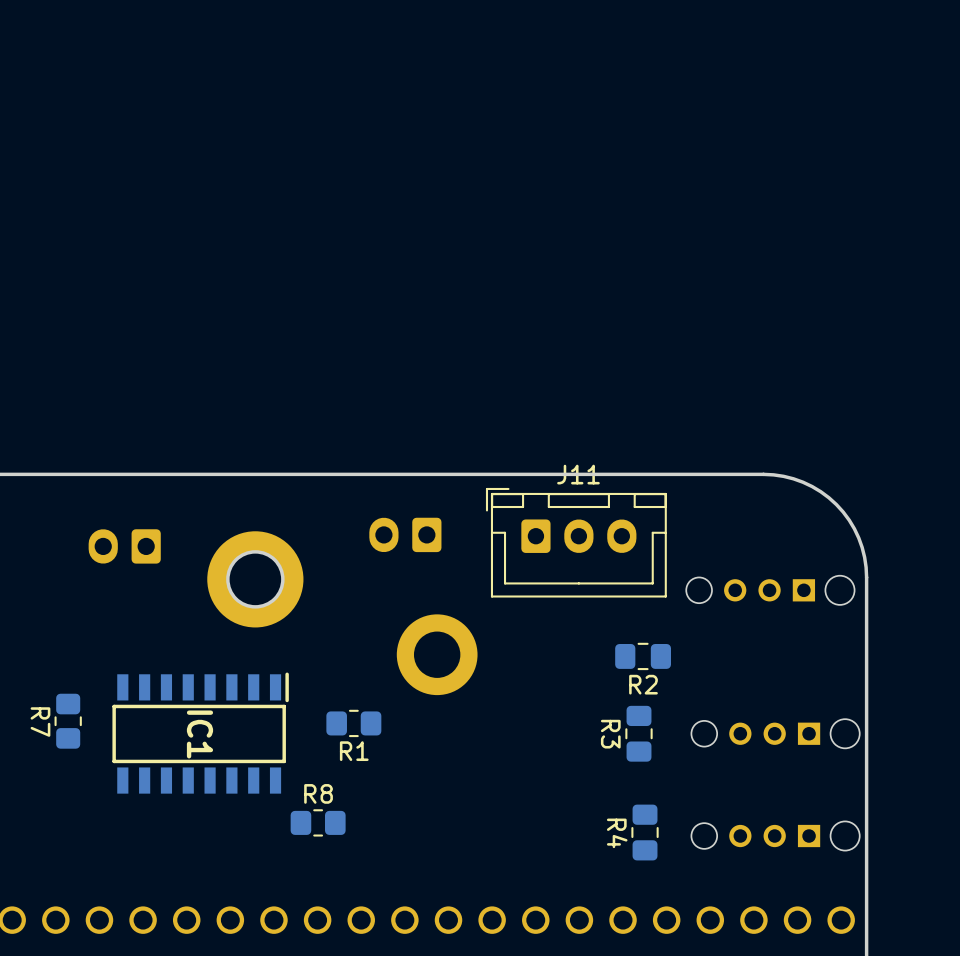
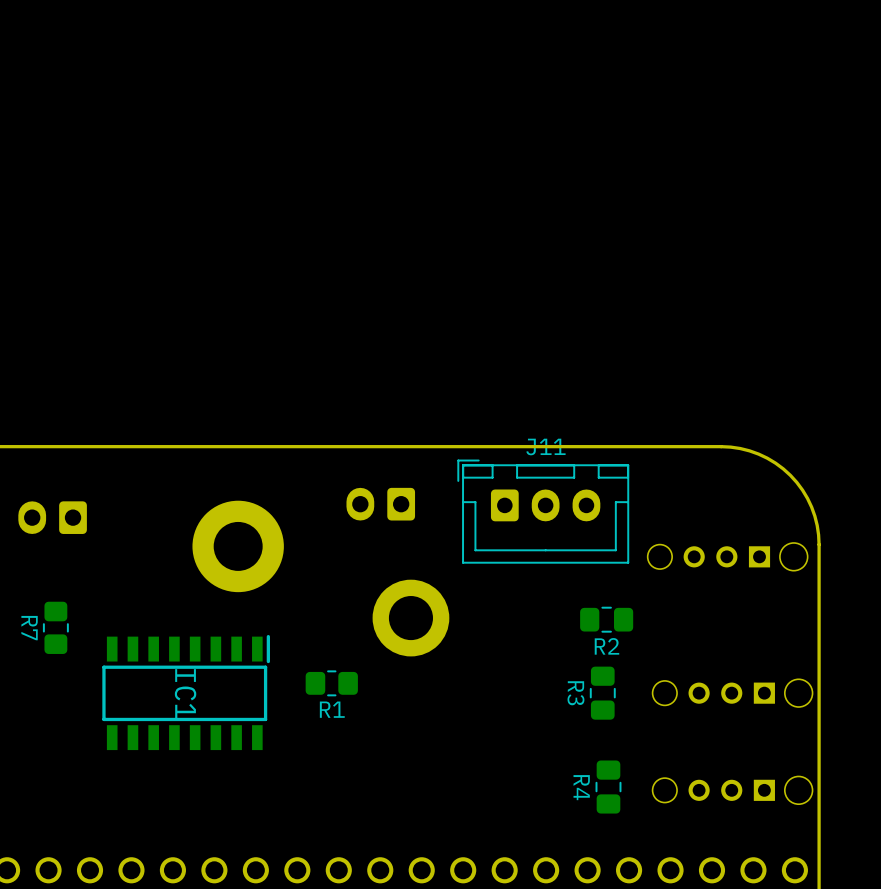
part position: (124, 546) -> (52, 517)
R7 position: (68, 721) -> (55, 627)
R8: (318, 822) -> none

